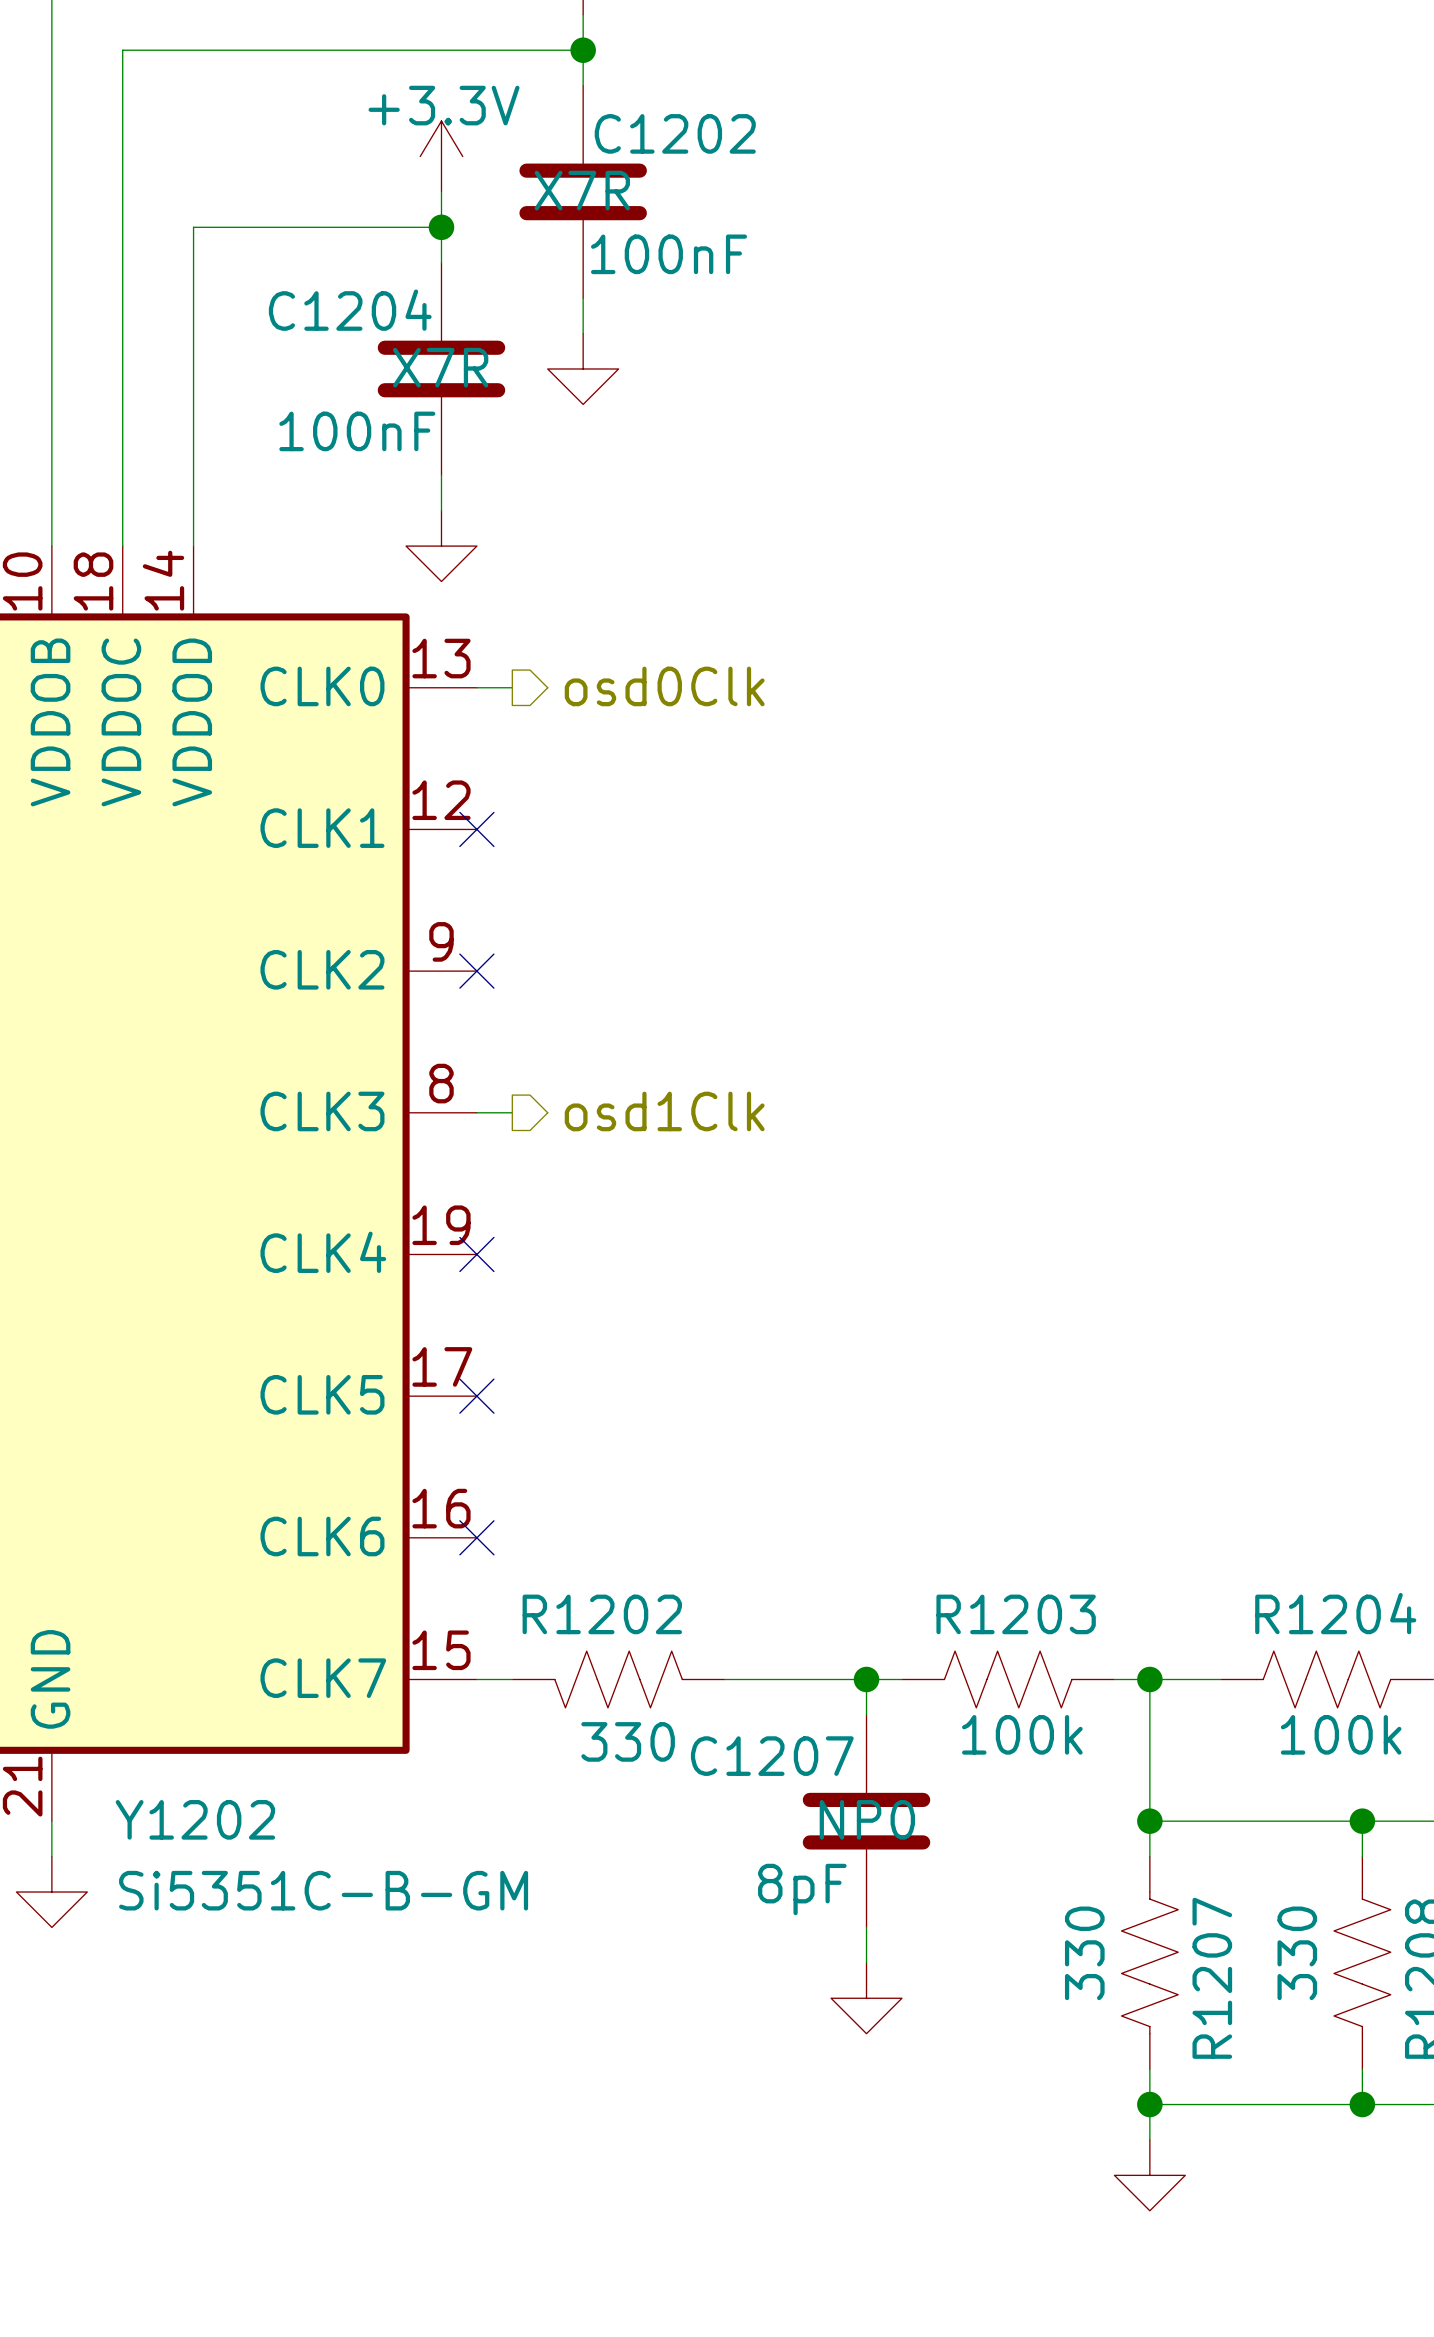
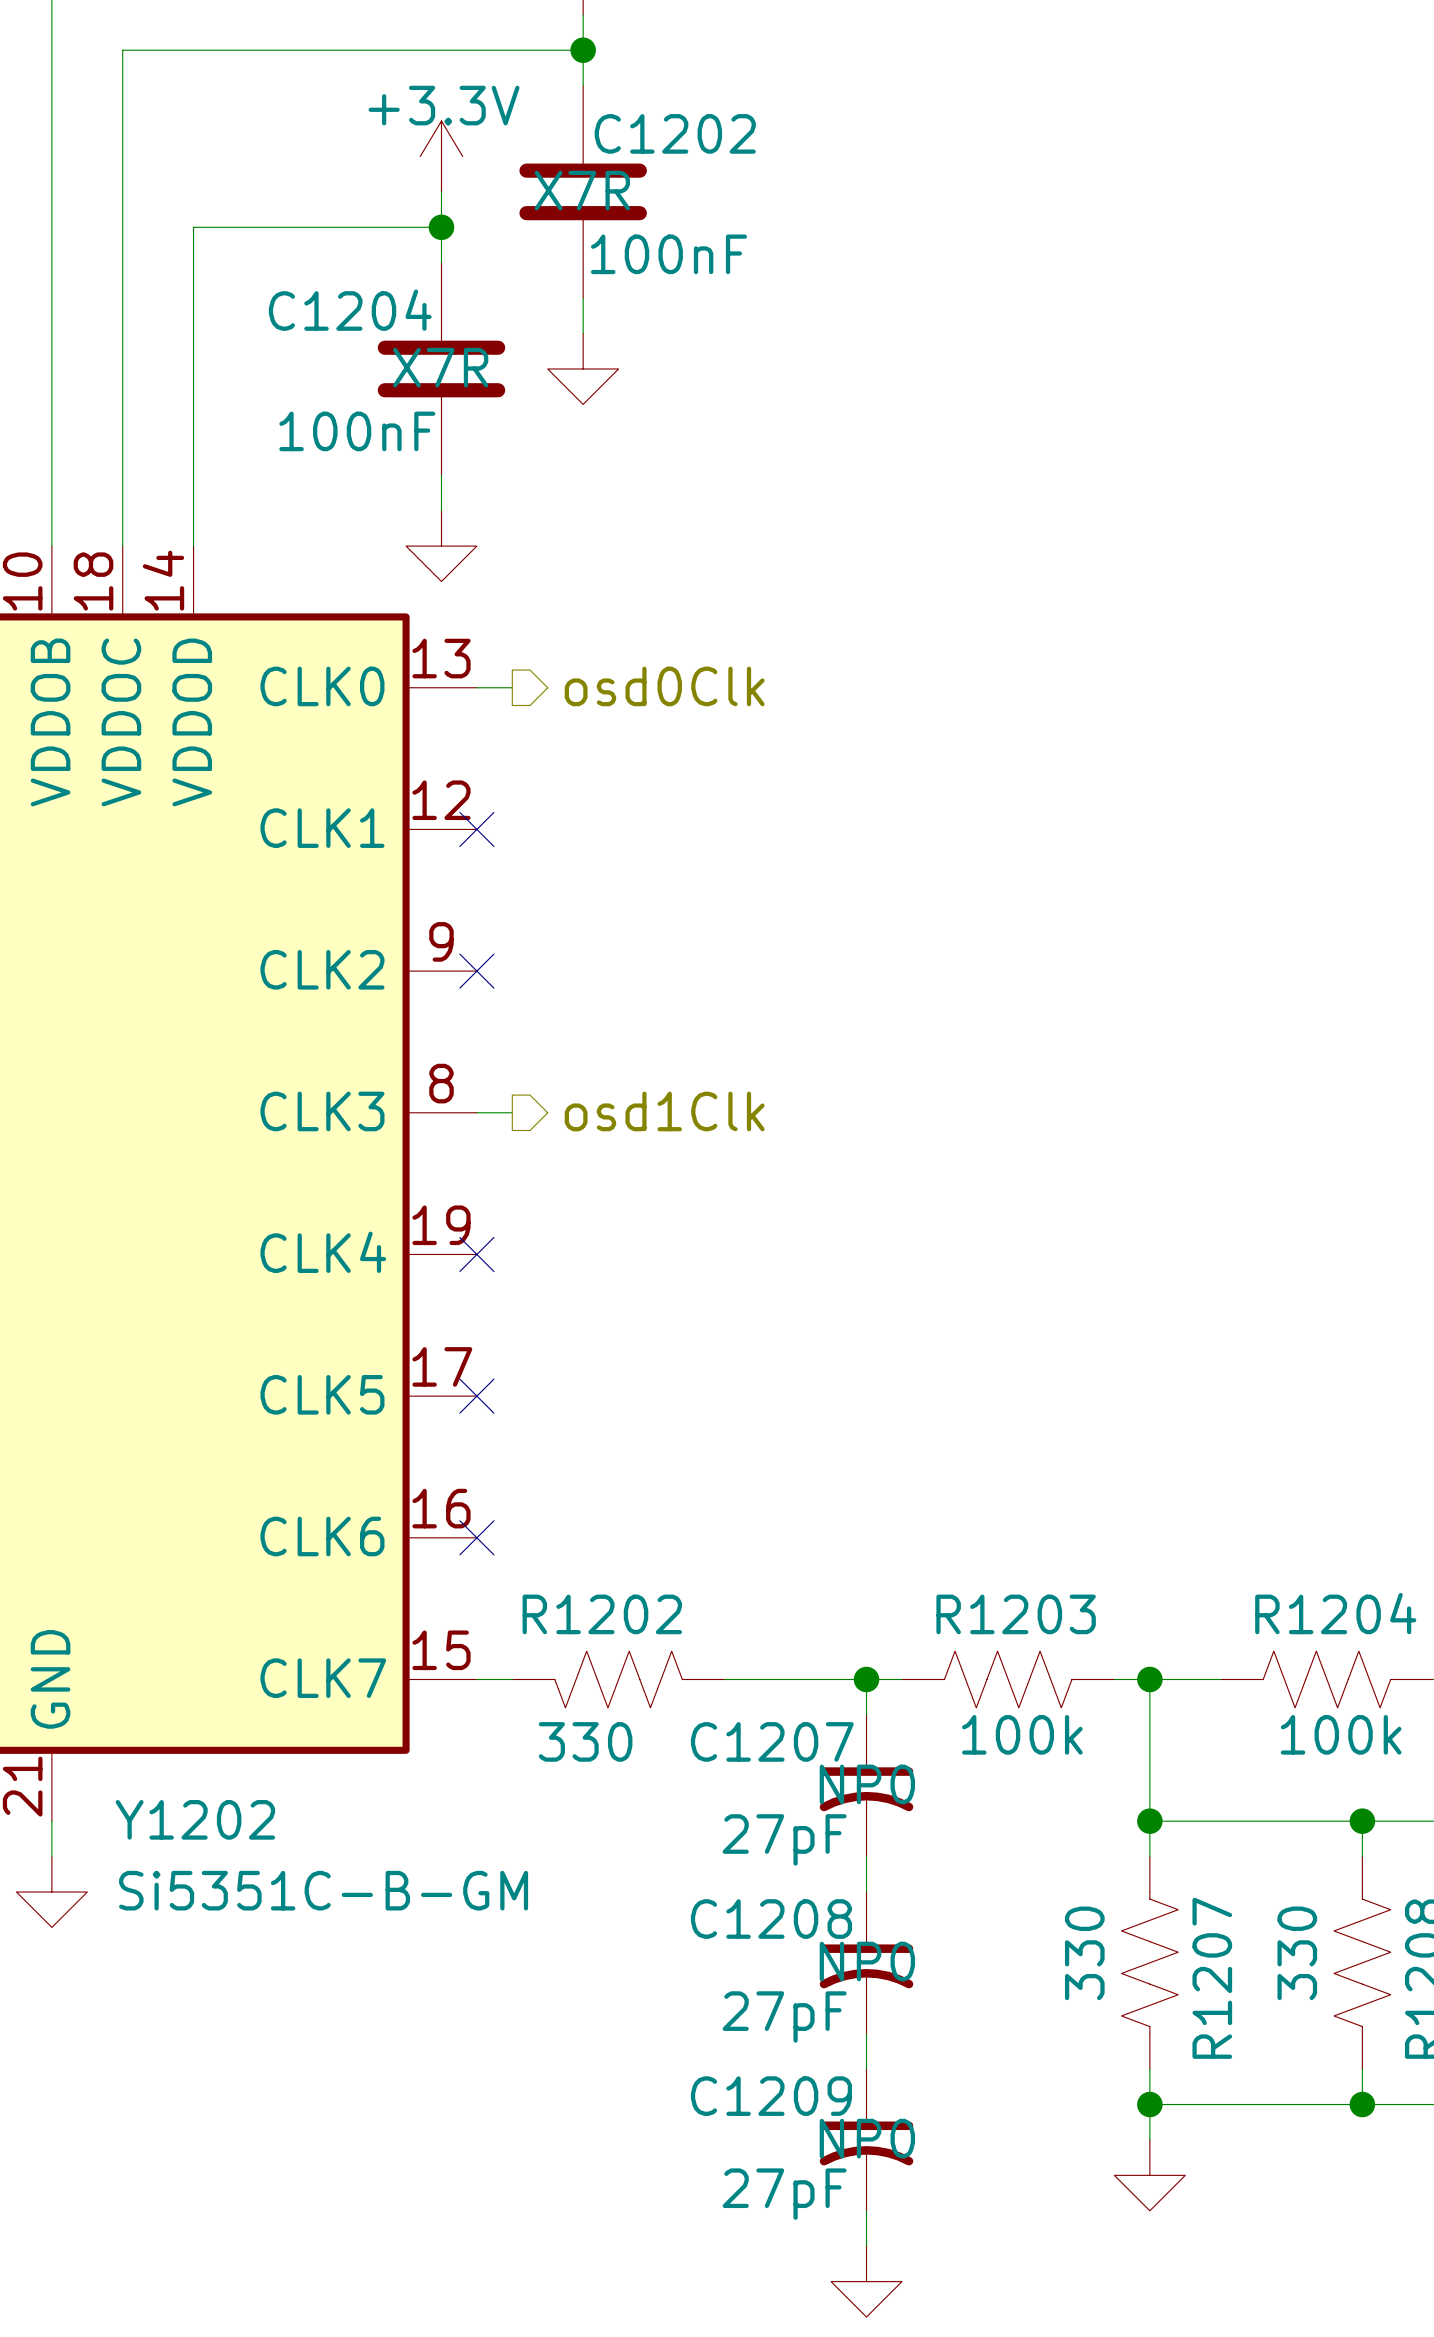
C1207 symbol: [802, 1714, 931, 1928] -> [819, 1714, 914, 1857]
R1202 value position: 330 (628, 1741) -> 330 (585, 1741)
C1207 value: 8pF (802, 1889) -> 27pF (784, 1839)
C1208: none -> 27pF (866, 1962)
power symbol position: (866, 1998) -> (866, 2281)
wire: none -> (866, 2033) (866, 2069)
C1209: none -> 27pF (866, 2139)
wire: none -> (866, 2210) (866, 2246)

